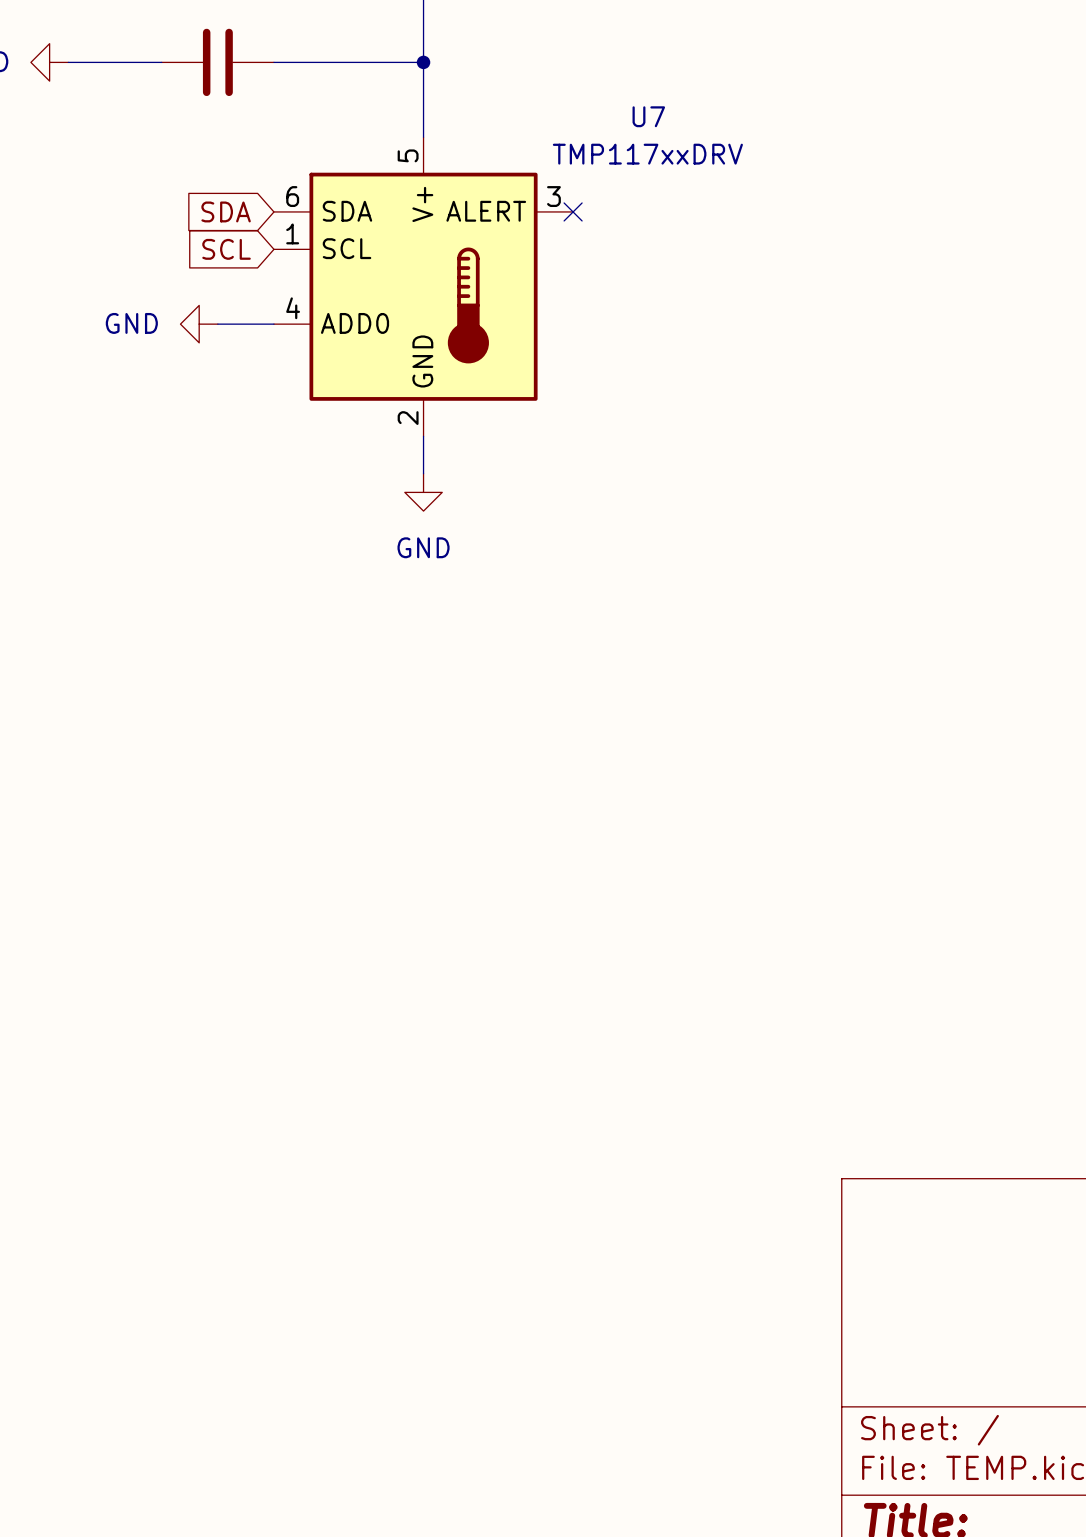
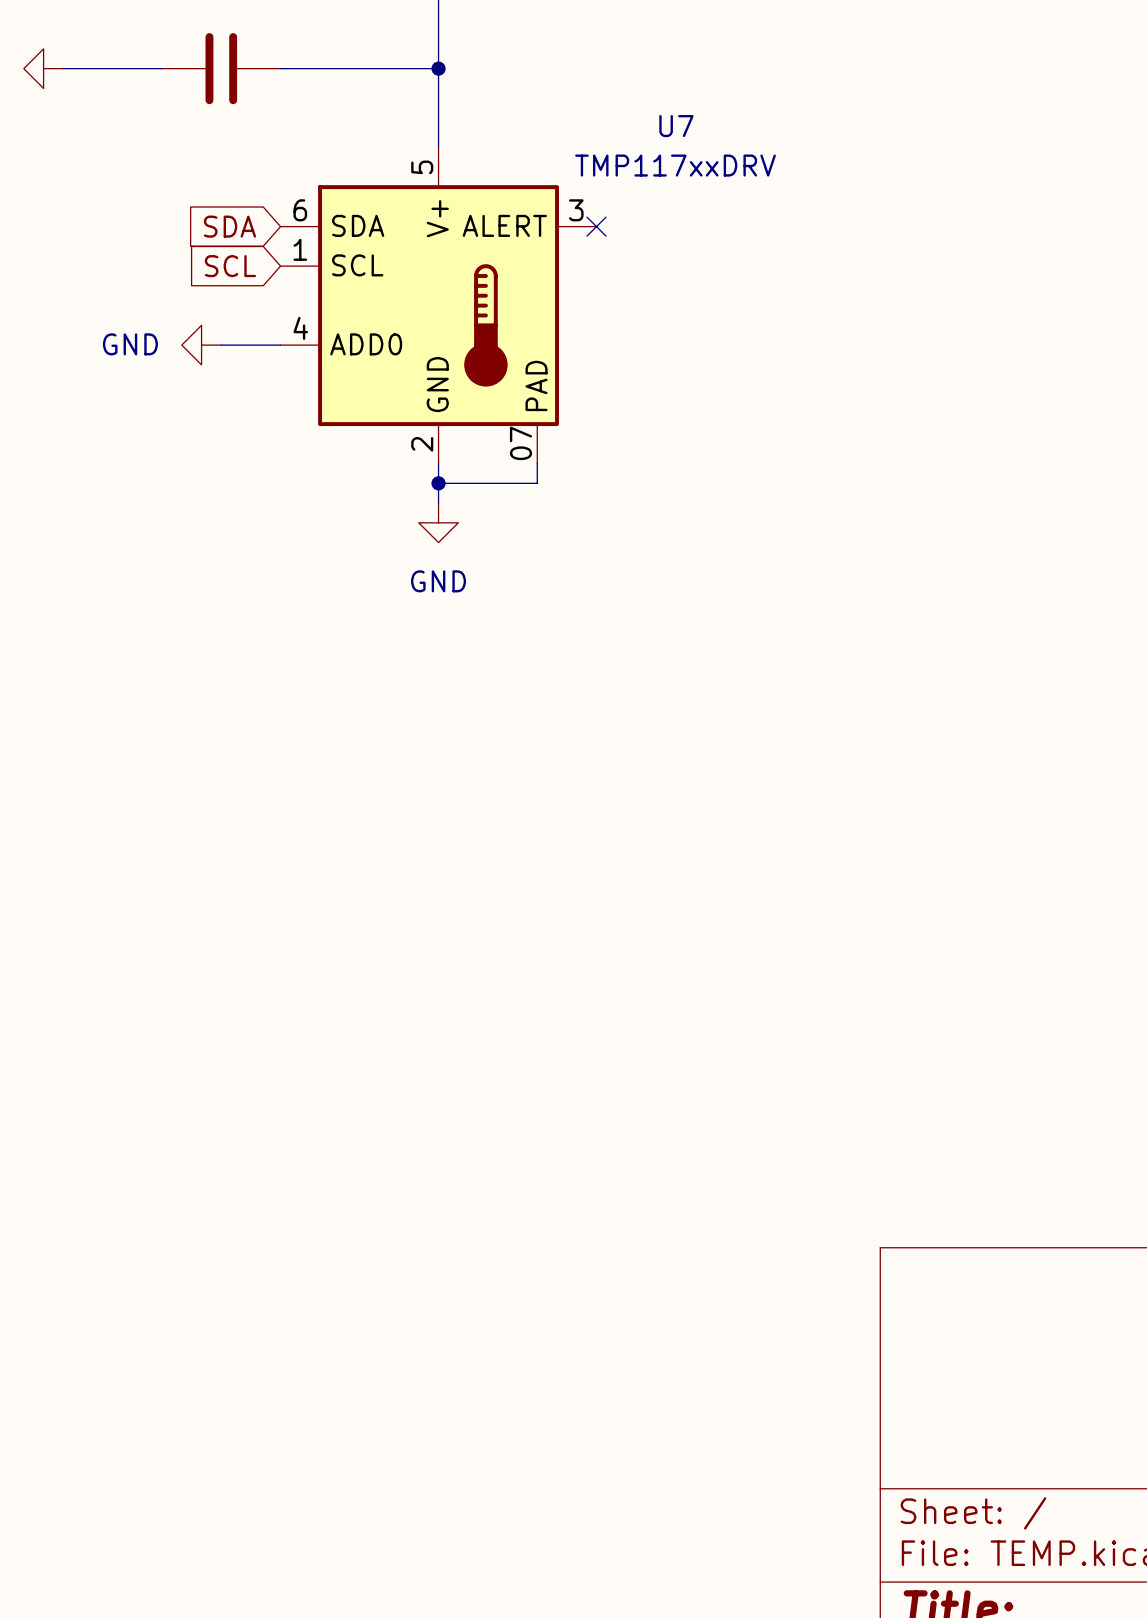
U7 symbol: [273, 137, 574, 437] -> [280, 147, 597, 464]
wire: none -> (537, 463) (537, 483) (438, 483)
junction: none -> (438, 483)

